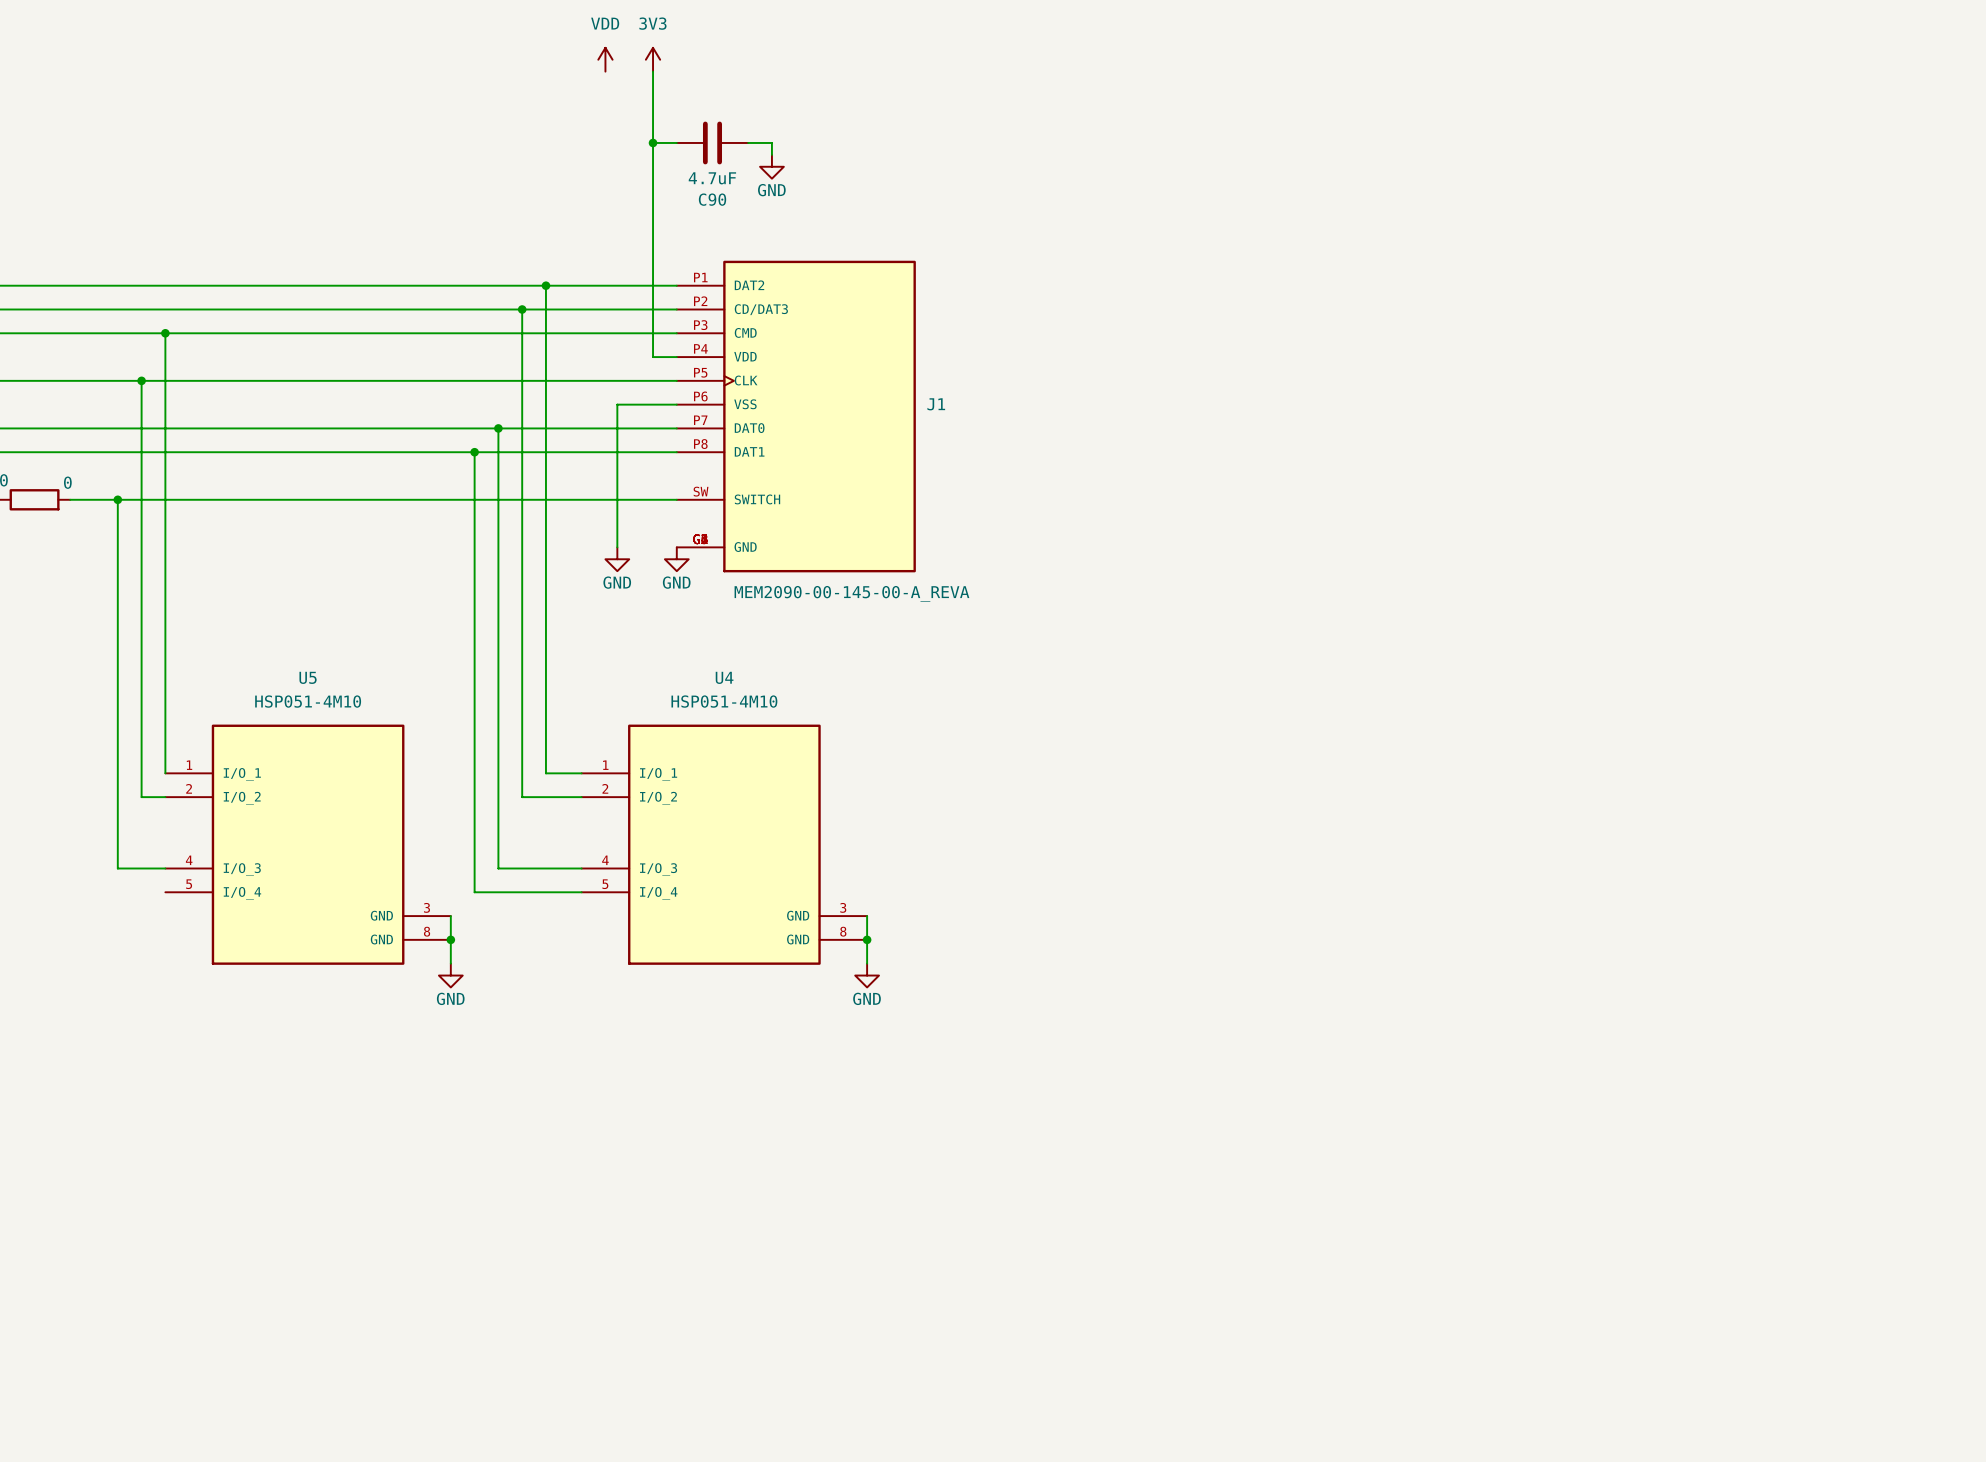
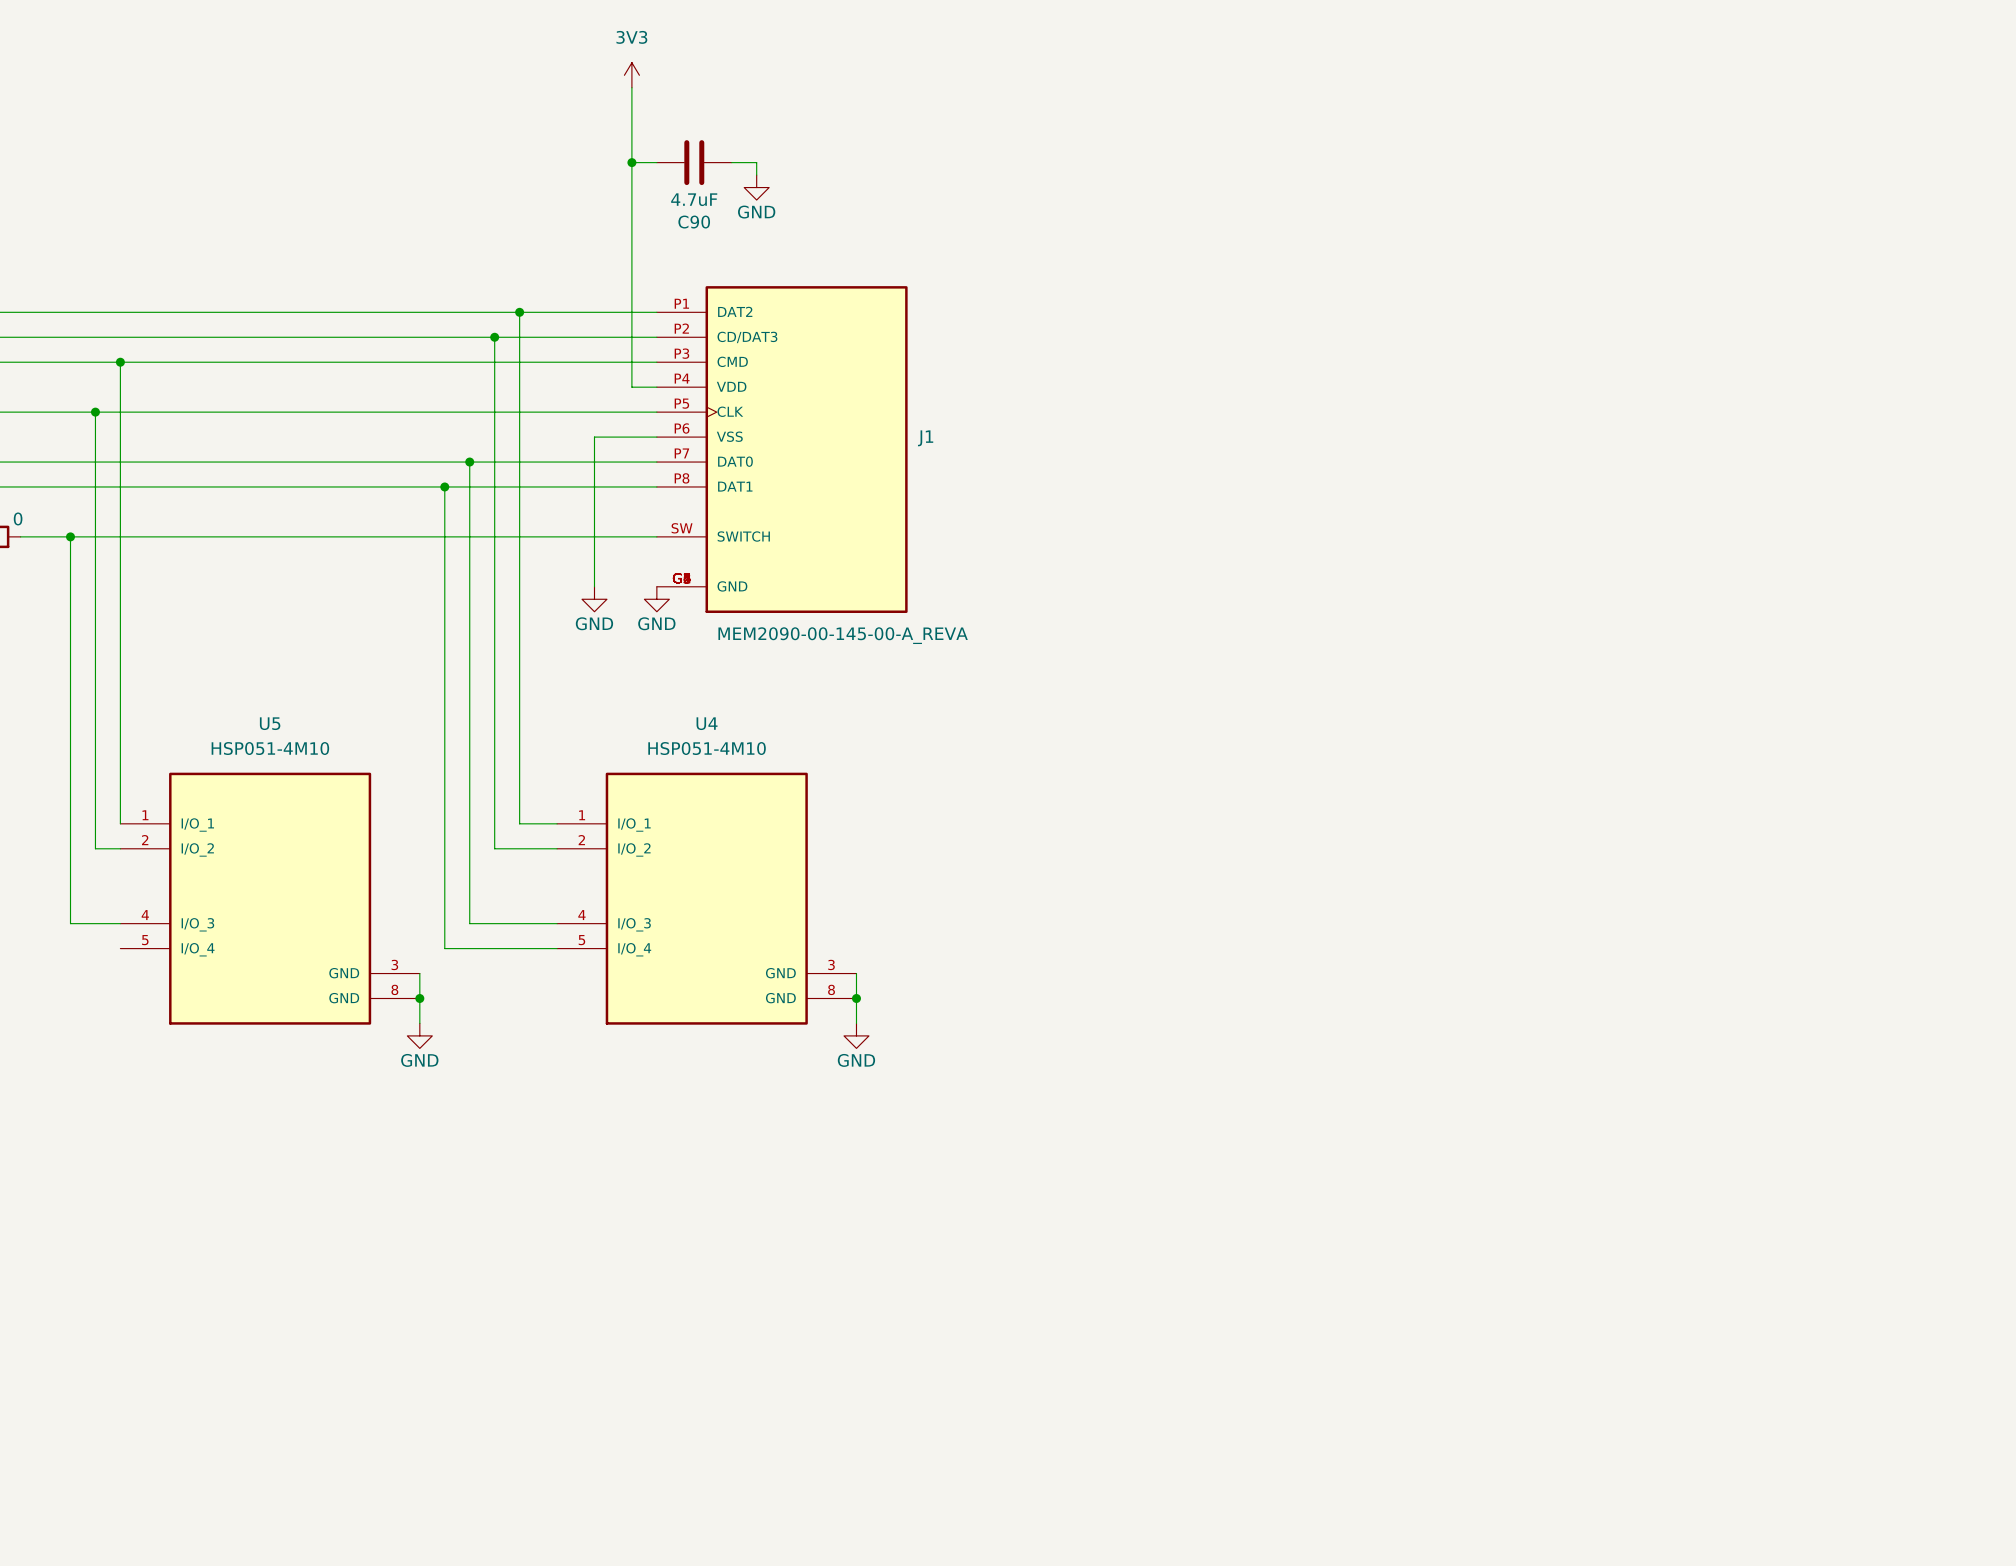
power symbol: VDD (605, 59) -> none

